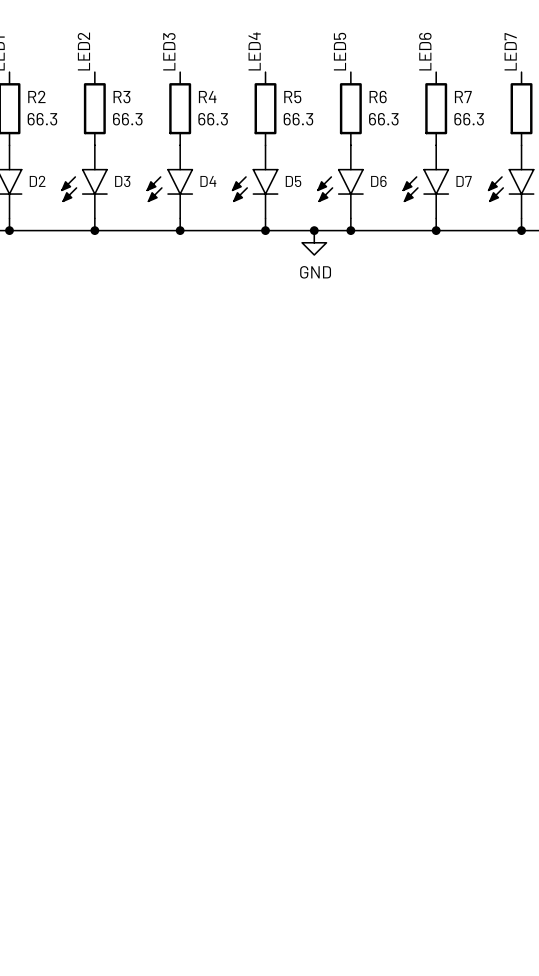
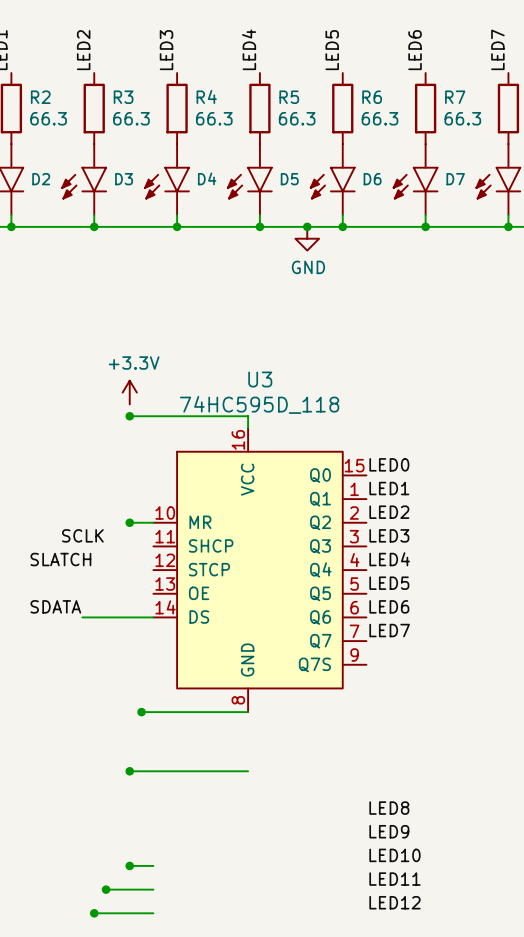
power symbol: none -> +3.3V (129, 392)
wire: none -> (129, 416) (248, 416) (248, 428)
junction: none -> (129, 416)
label: none -> LED0 (389, 464)
label: none -> LED1 (389, 488)
label: none -> LED2 (389, 512)
wire: none -> (129, 522) (153, 522)
junction: none -> (129, 522)
label: none -> SCLK (82, 535)
label: none -> LED3 (389, 535)
label: none -> SLATCH (60, 559)
label: none -> LED4 (389, 559)
U3: none -> 74HC595D_118 (259, 570)
label: none -> LED5 (389, 583)
label: none -> SDATA (55, 606)
label: none -> LED6 (389, 606)
wire: none -> (82, 617) (153, 617)
label: none -> LED7 (389, 630)
wire: none -> (141, 712) (248, 712)
junction: none -> (141, 712)
wire: none -> (129, 771) (248, 771)
junction: none -> (129, 771)
label: none -> LED8 (389, 808)
label: none -> LED9 (389, 831)
label: none -> LED10 (394, 855)
wire: none -> (129, 865) (153, 865)
junction: none -> (129, 865)
label: none -> LED11 (394, 879)
wire: none -> (106, 889) (153, 889)
junction: none -> (106, 889)
label: none -> LED12 (394, 902)
wire: none -> (94, 913) (153, 913)
junction: none -> (94, 913)

